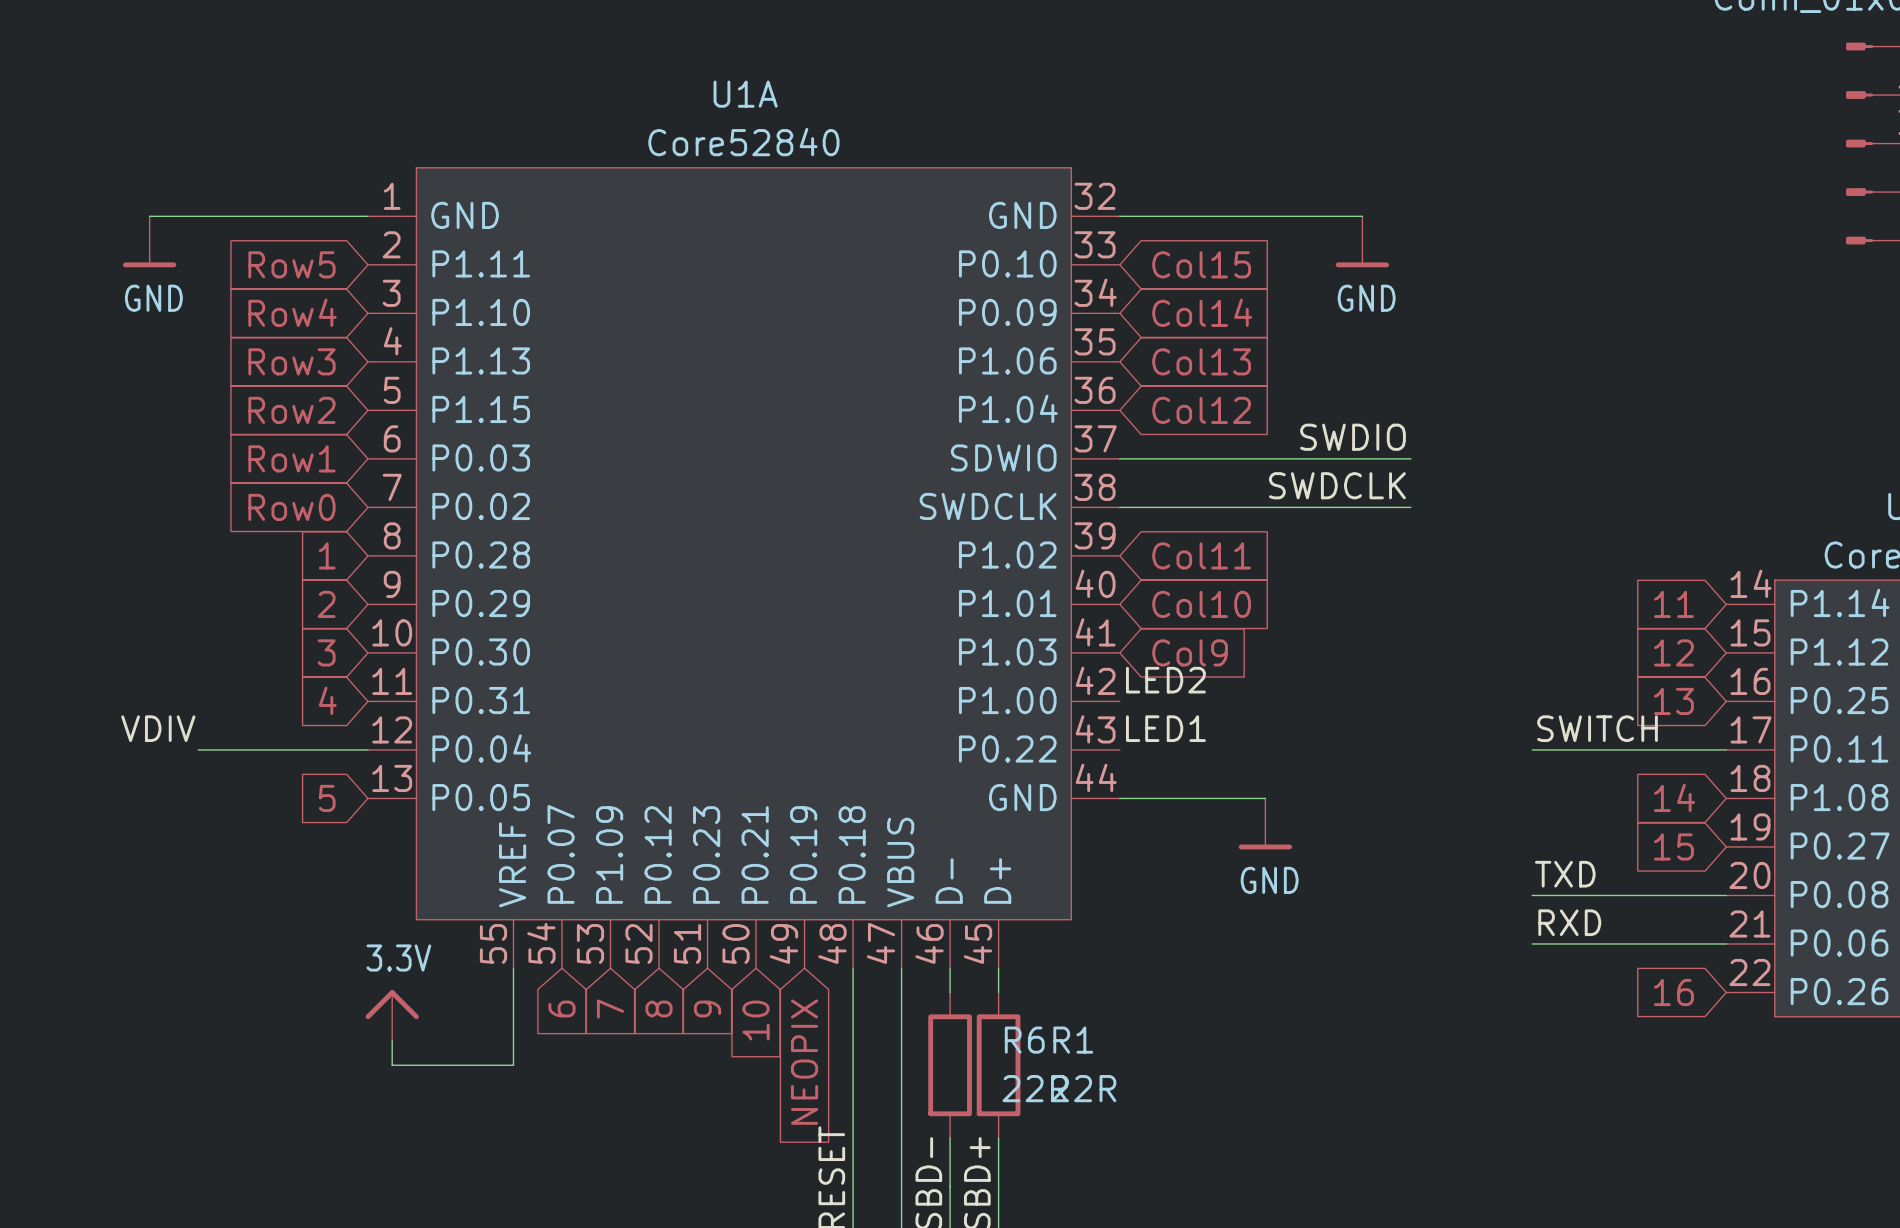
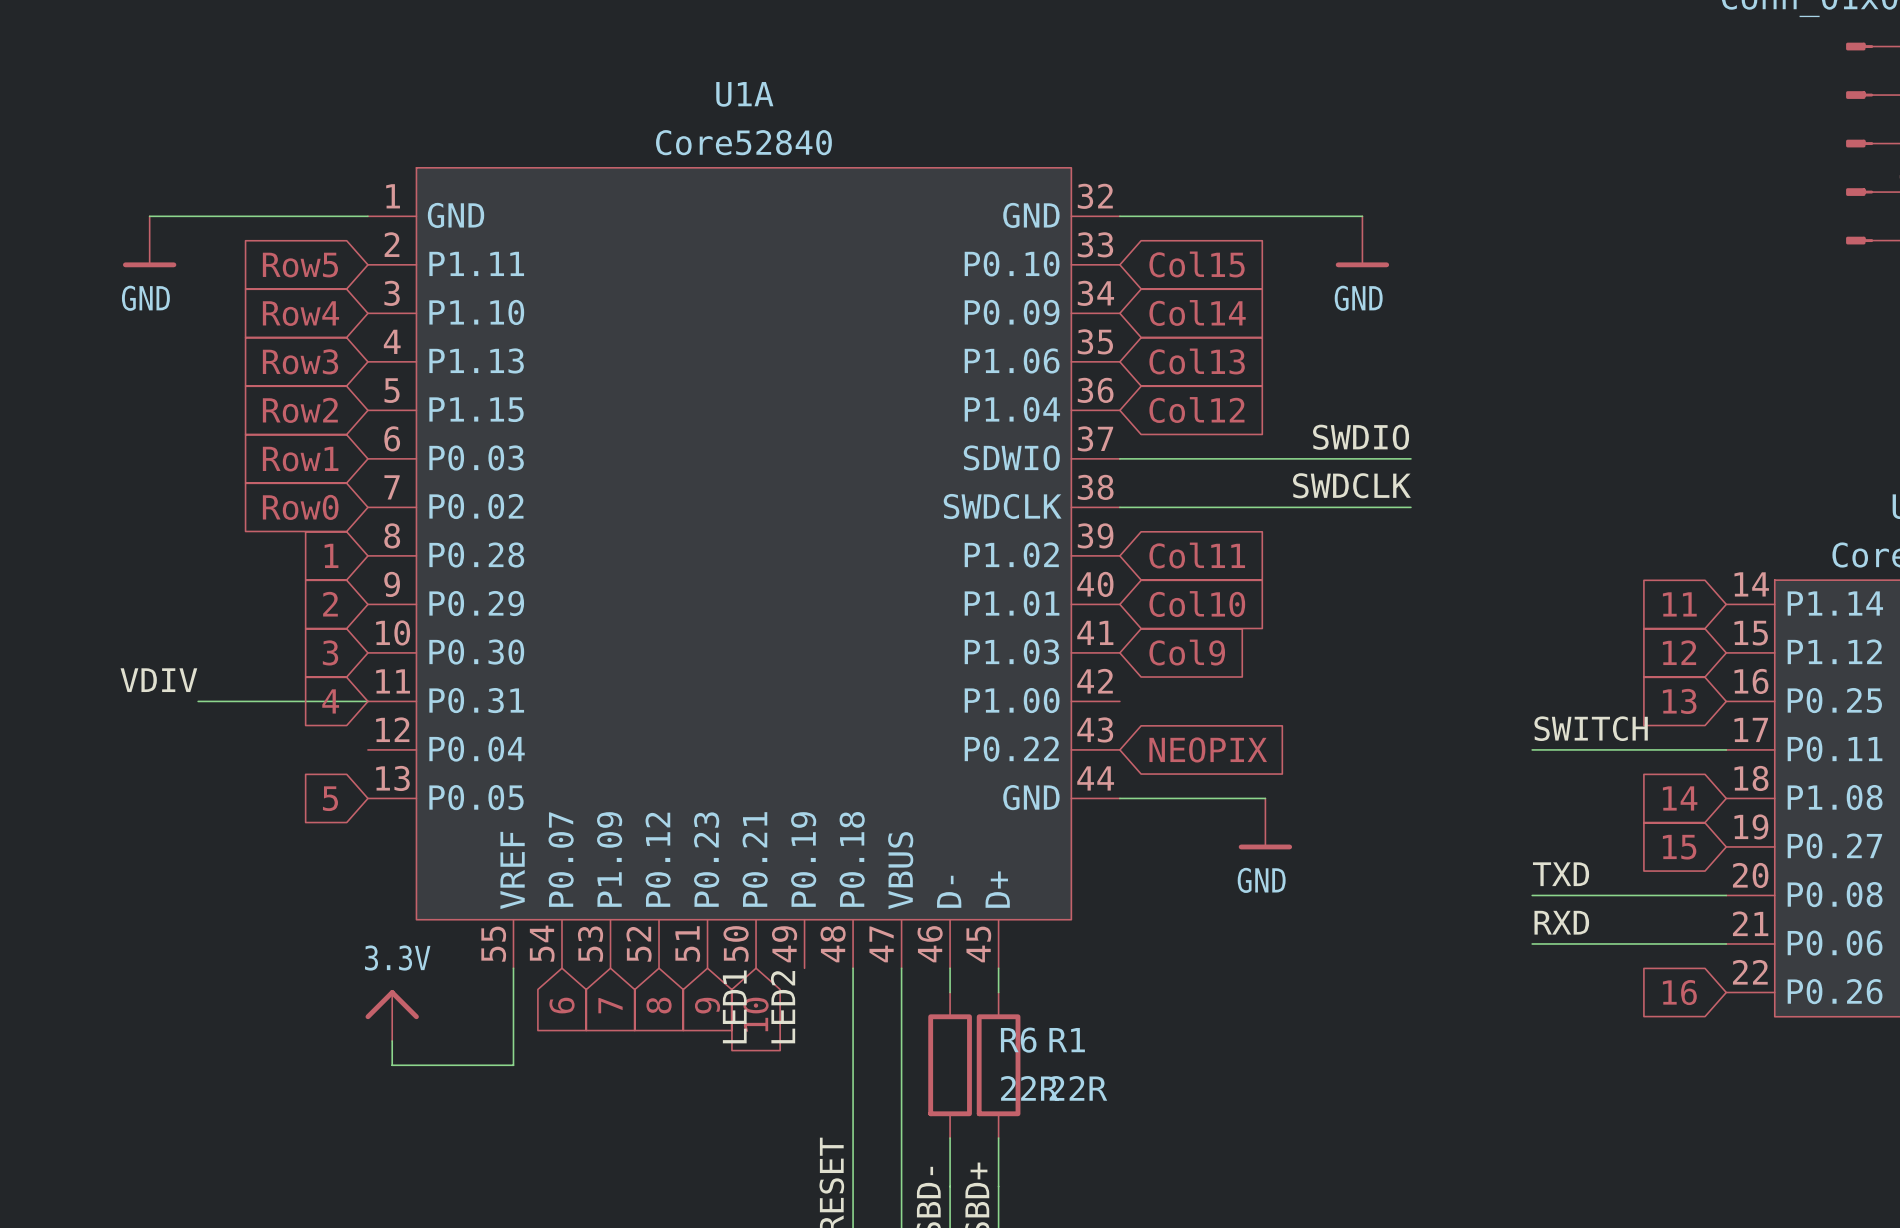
label rotation: 0° (1165, 680) -> 90° counterclockwise (783, 1007)
label position: LED2 (1165, 680) -> LED2 (783, 1007)
label position: VDIV (158, 728) -> VDIV (158, 680)
label rotation: 0° (1165, 728) -> 90° counterclockwise (734, 1006)
label position: LED1 (1165, 728) -> LED1 (734, 1006)
wire: (198, 749) (367, 749) -> (198, 701) (367, 701)
global label rotation: 0° (804, 1062) -> 90° counterclockwise (1208, 749)
global label position: NEOPIX (804, 1062) -> NEOPIX (1208, 749)

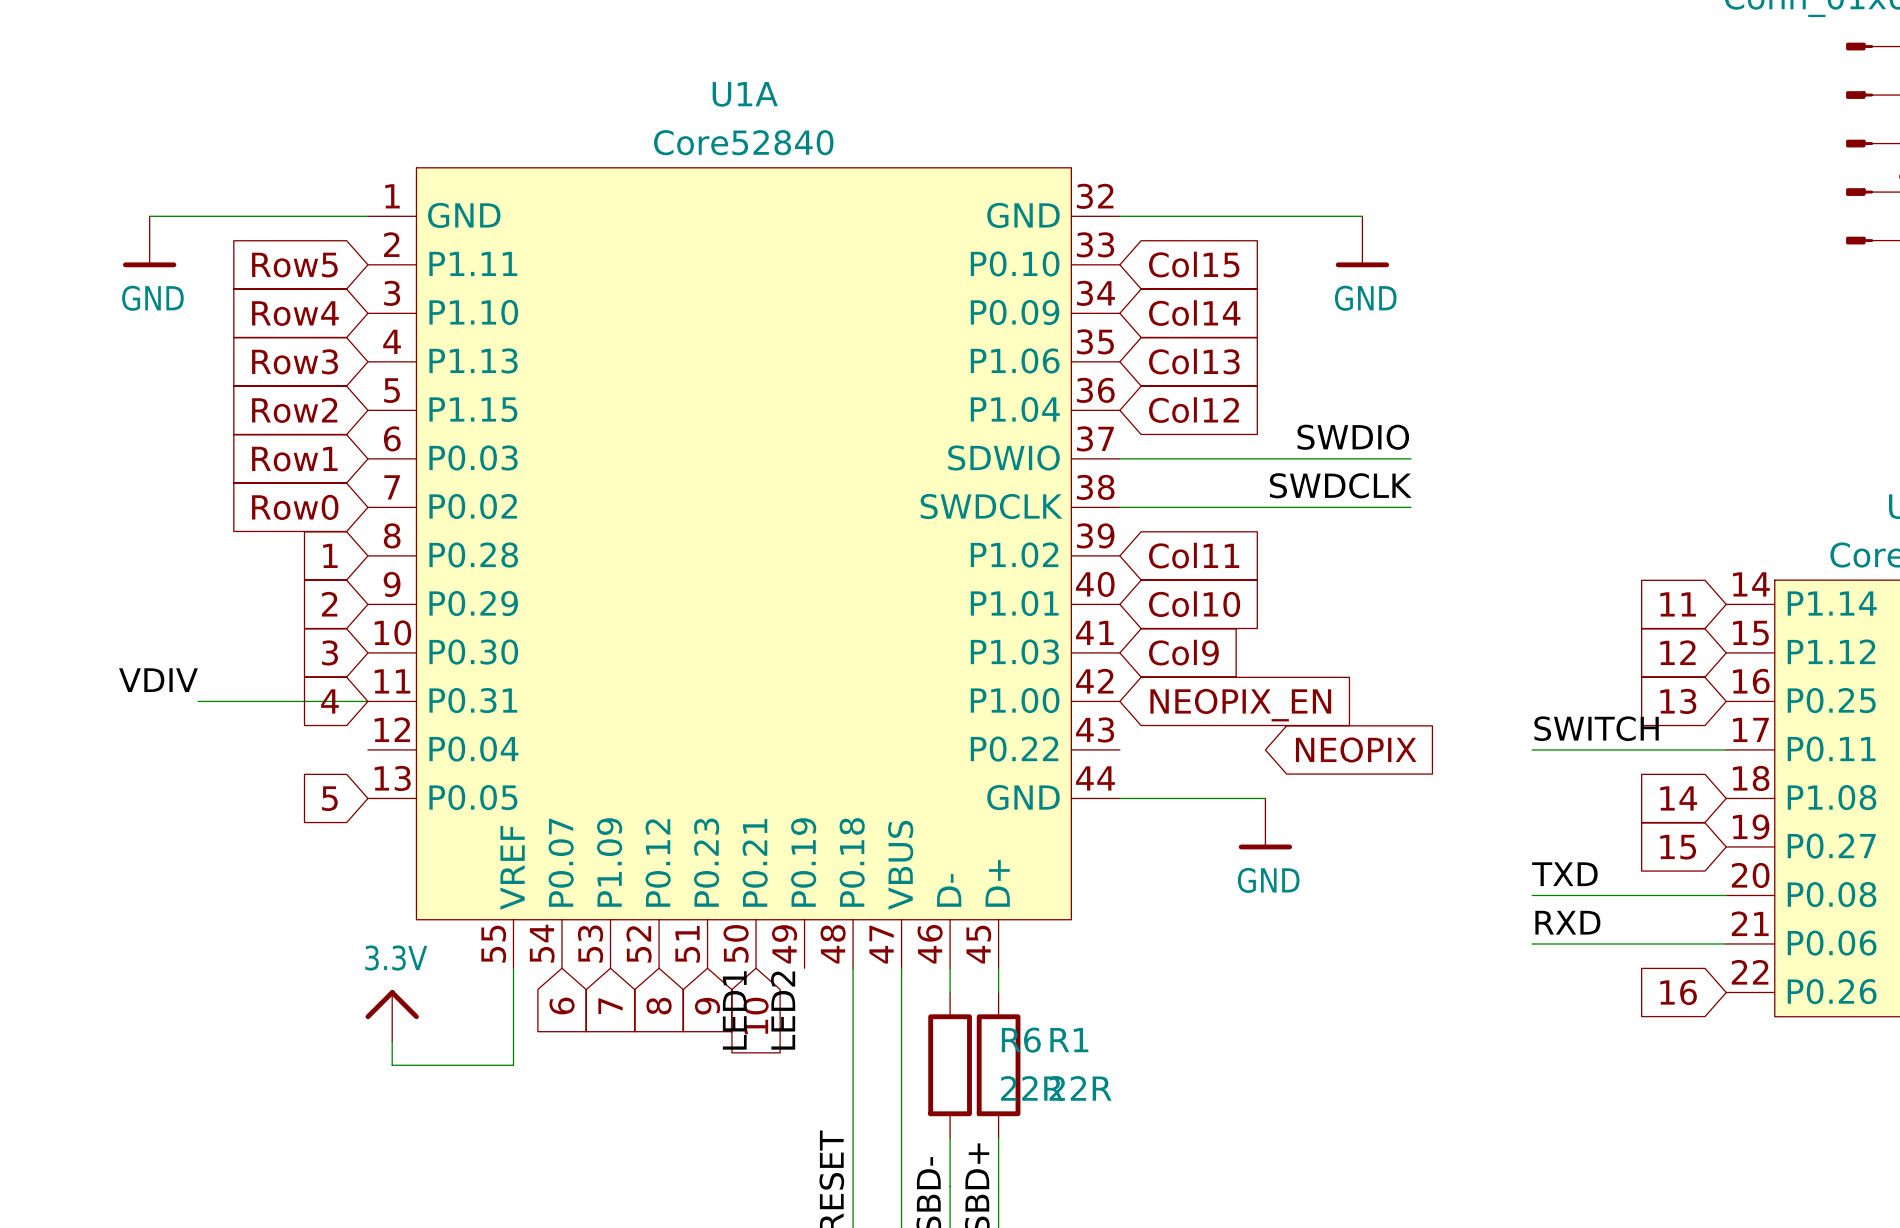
global label: none -> NEOPIX_EN (1240, 705)
global label position: NEOPIX (1208, 749) -> NEOPIX (1356, 749)

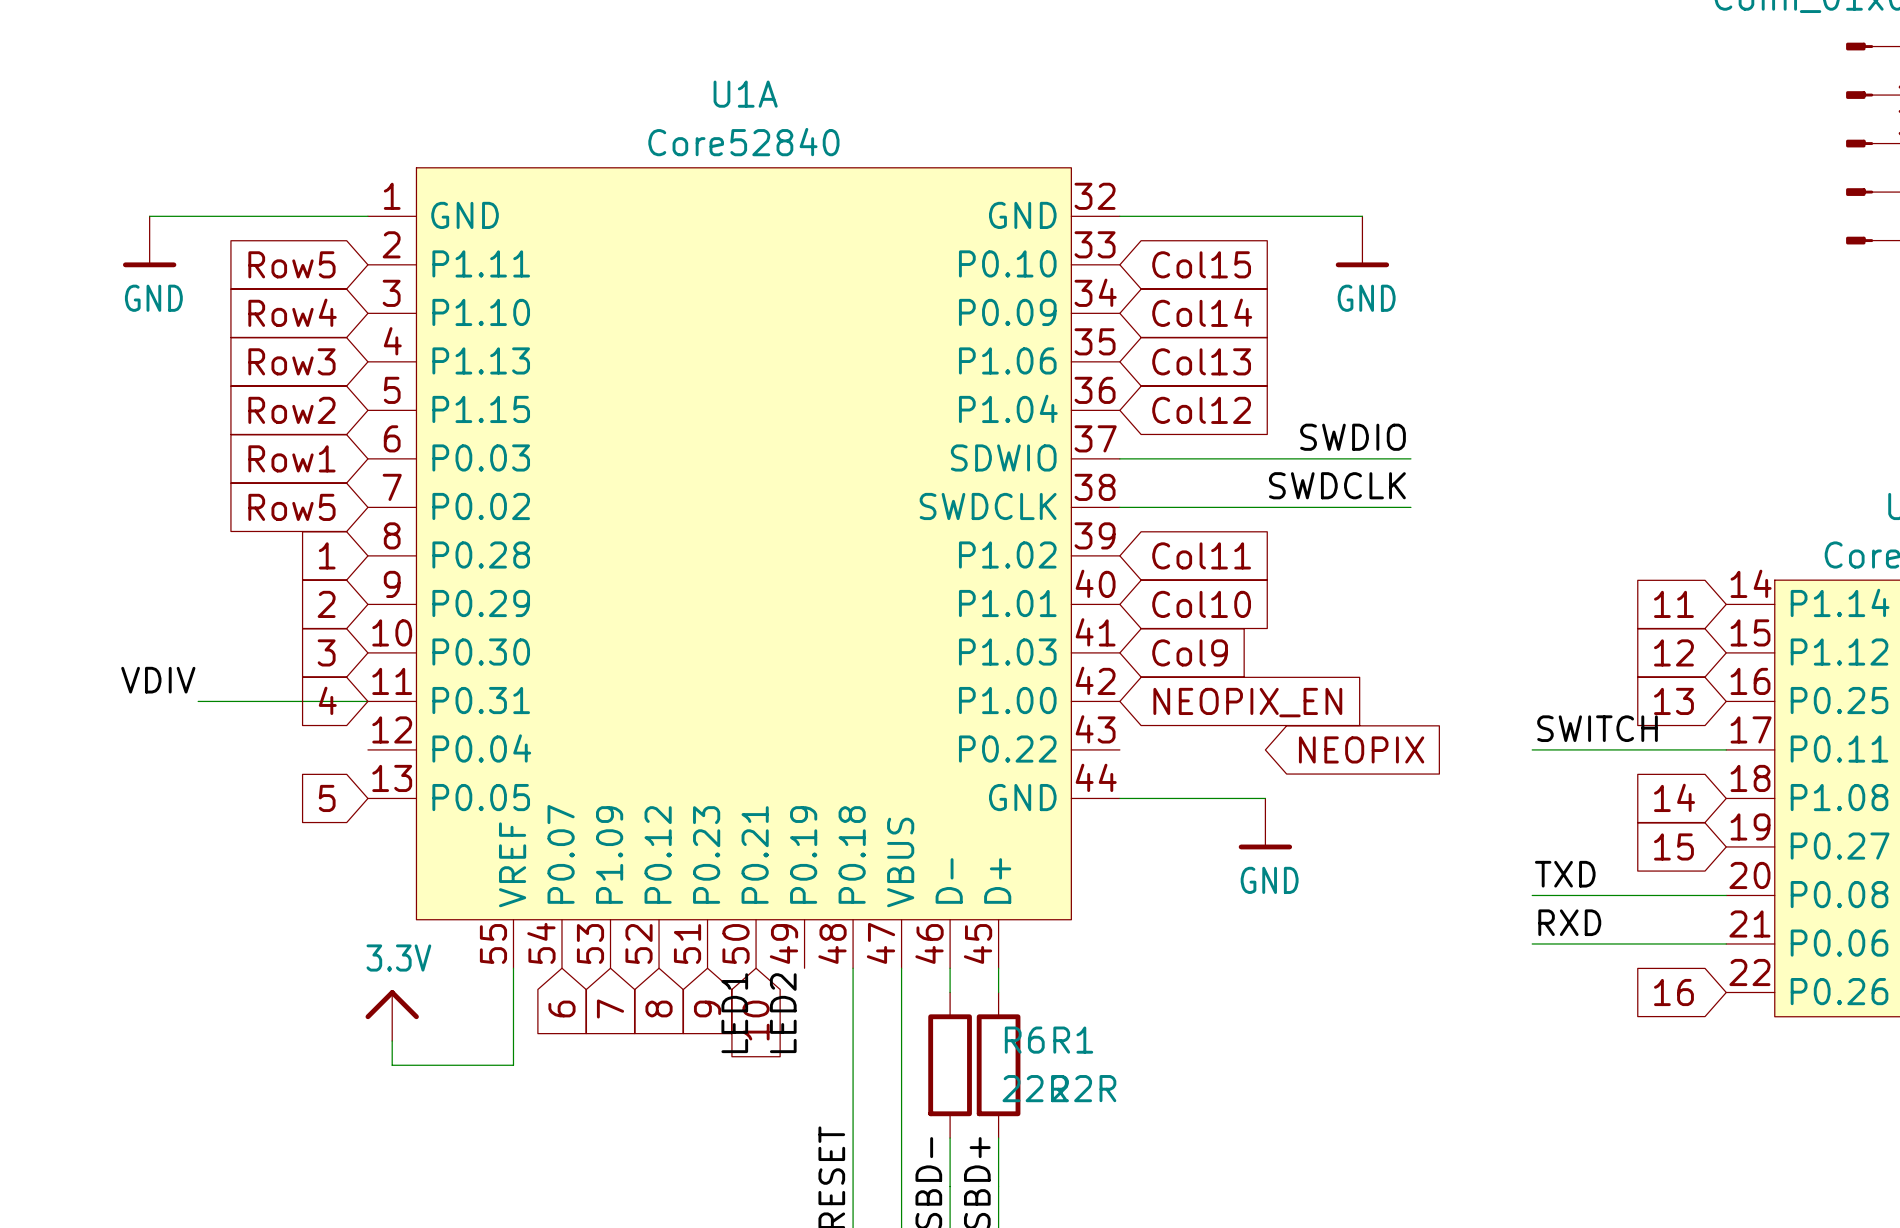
global label: Row0 (295, 507) -> Row5 (291, 507)

